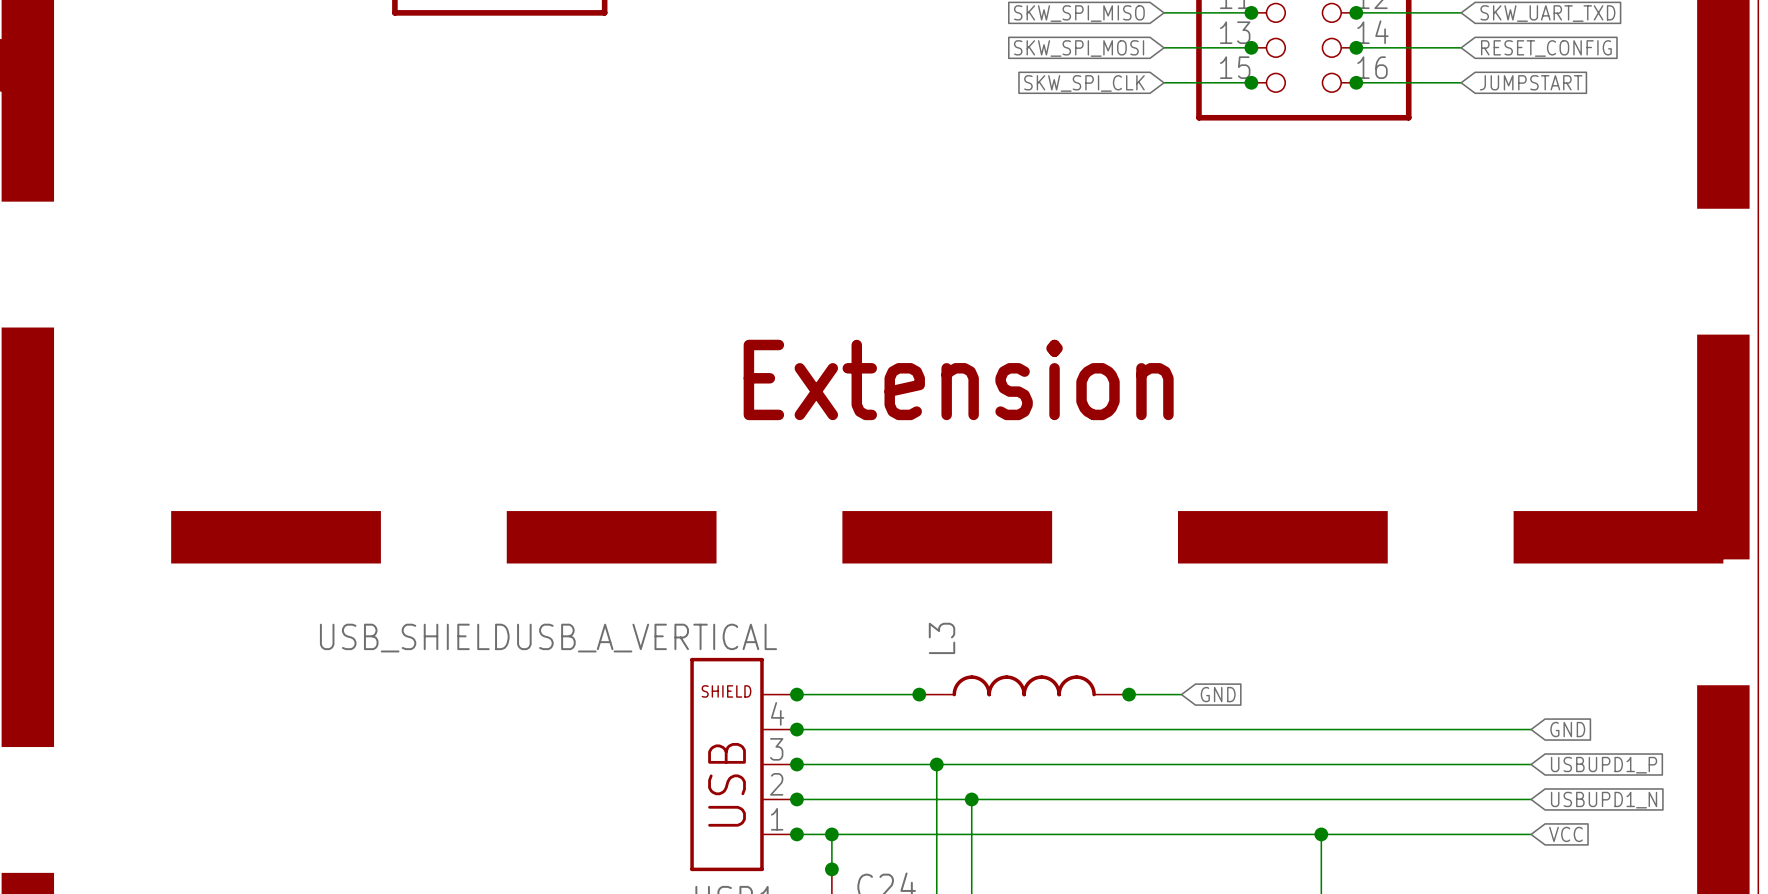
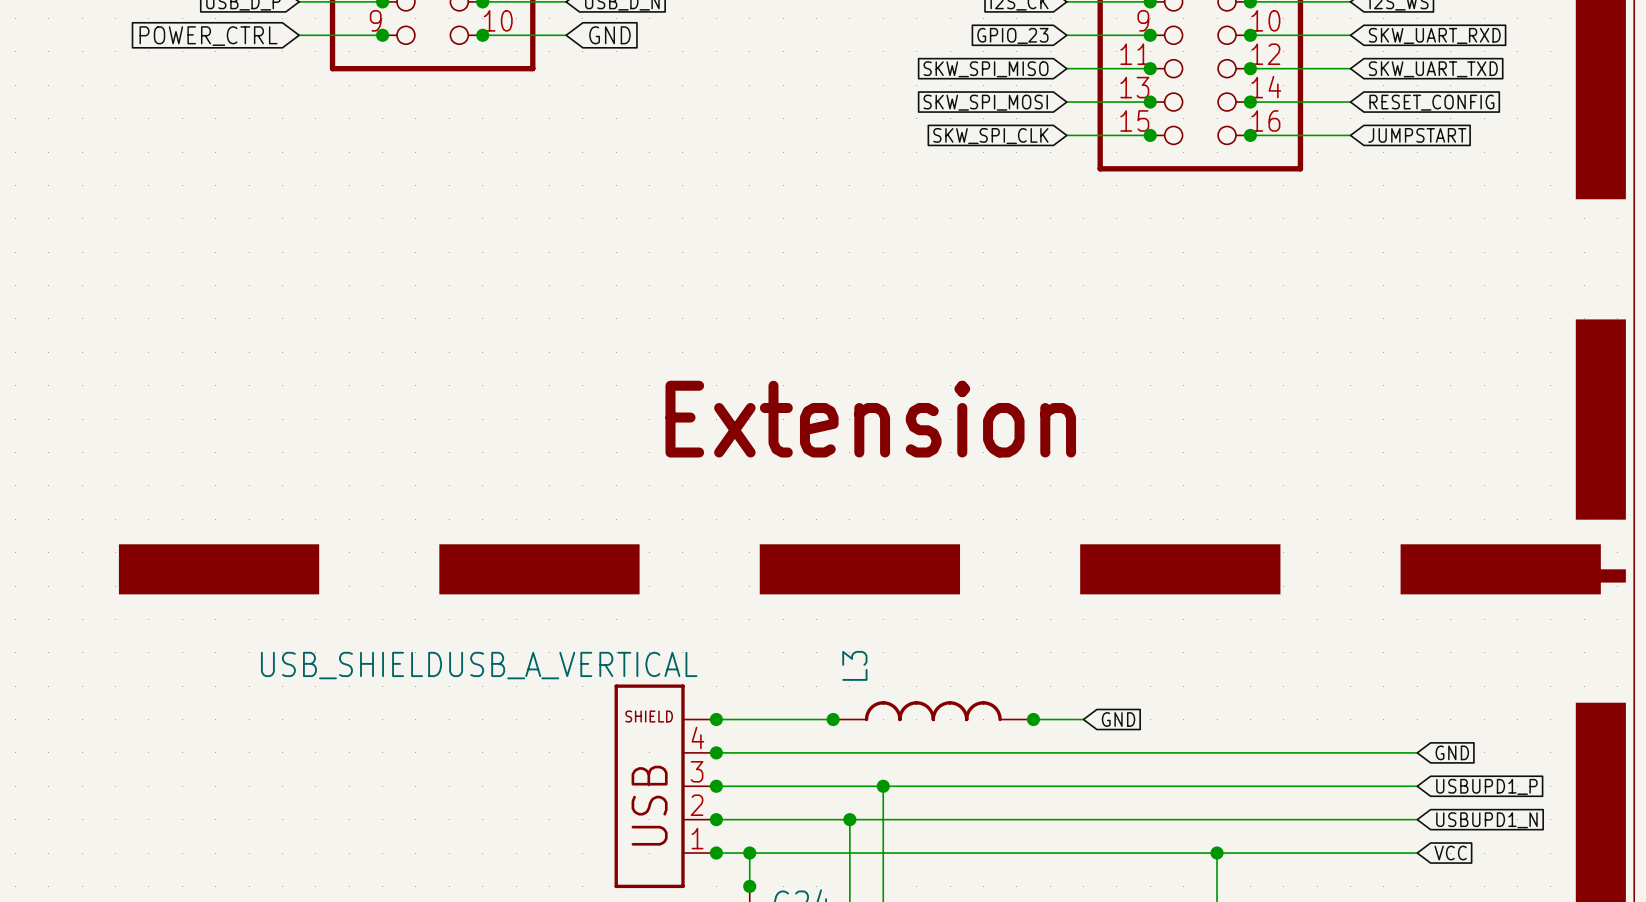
wire: (936, 764) (936, 799) -> (883, 786) (883, 819)
junction: (936, 764) -> none
junction: none -> (883, 786)
junction: none -> (849, 819)
junction: (971, 799) -> none

